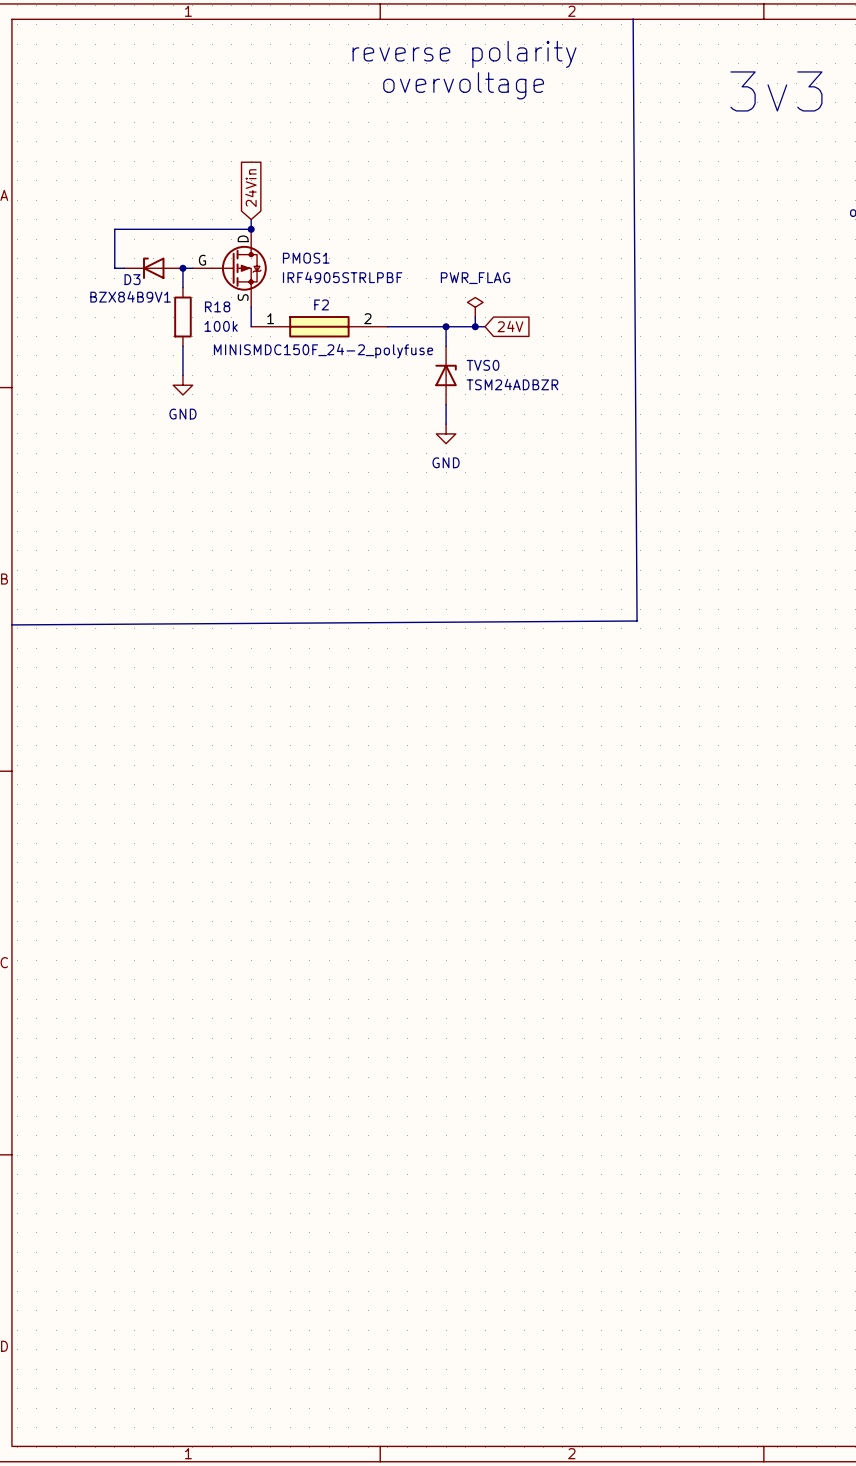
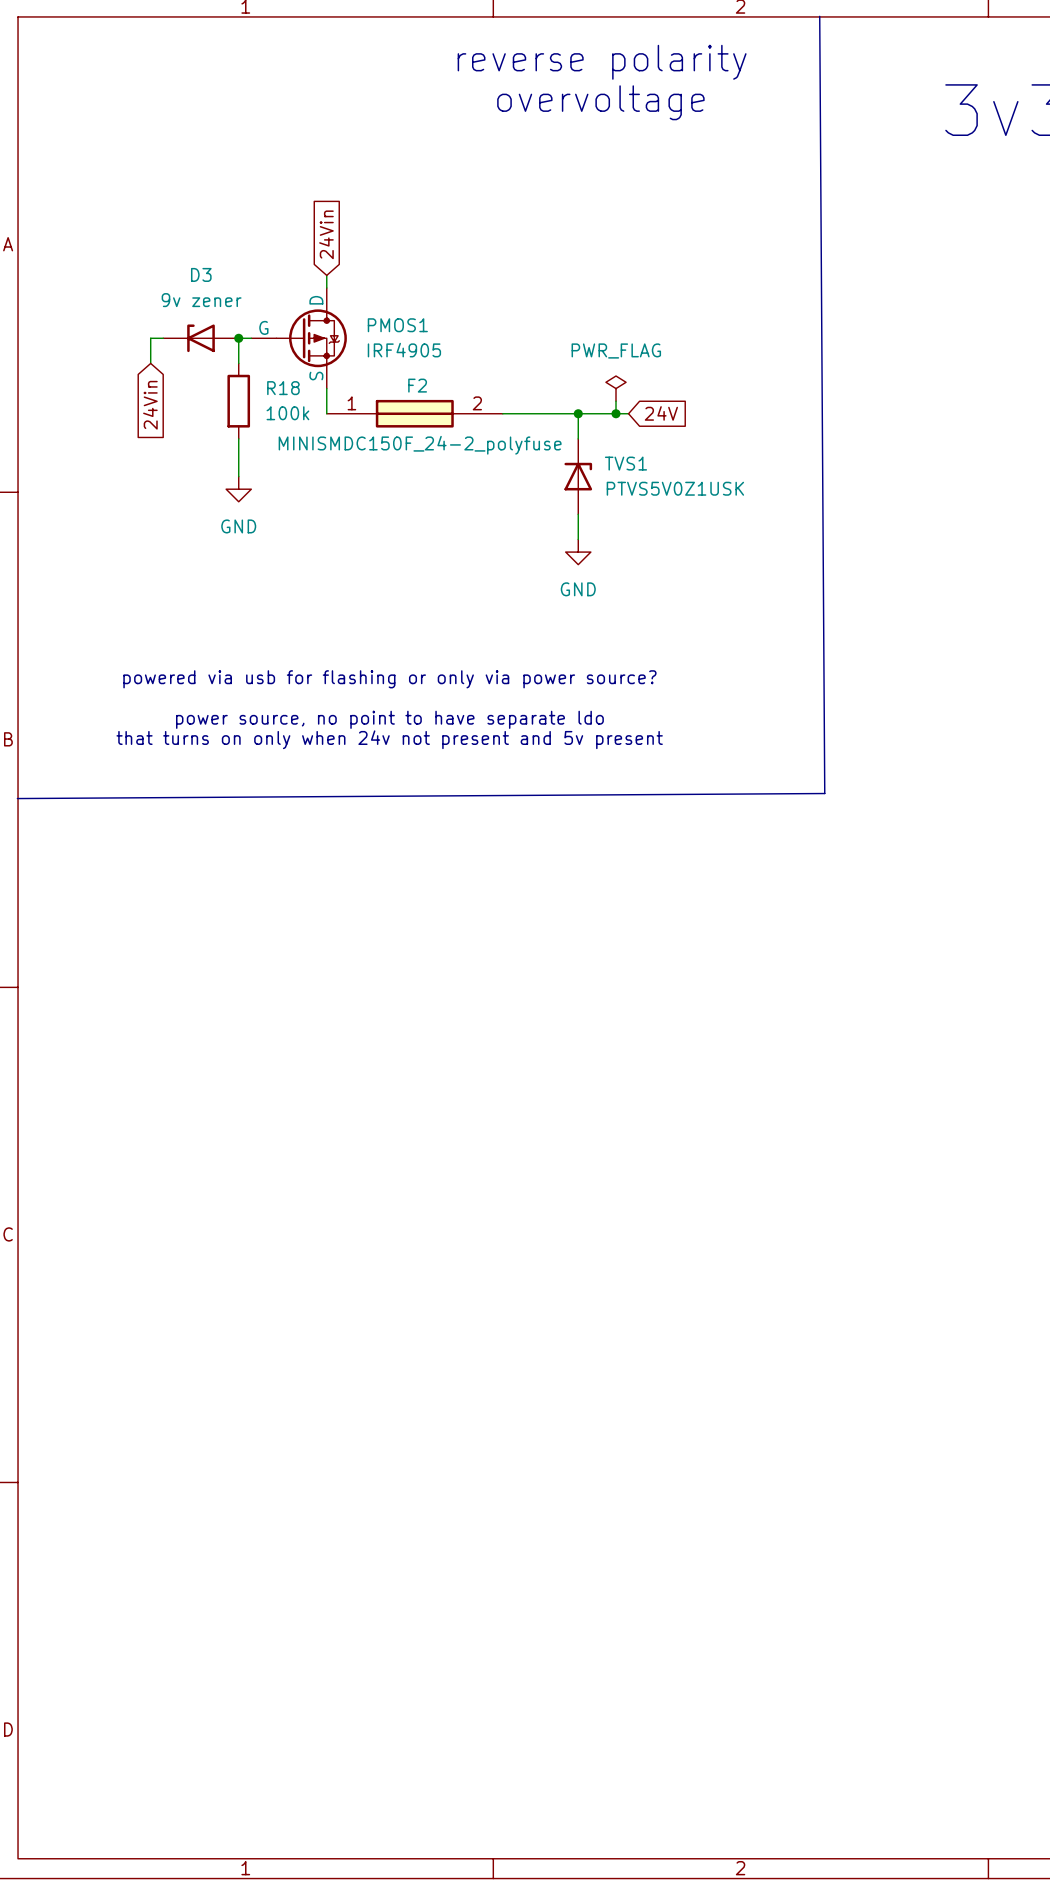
wire: (251, 229) (114, 229) (114, 268) -> (150, 363) (150, 338)
junction: (251, 229) -> none
PMOS1 value: IRF4905STRLPBF (342, 277) -> IRF4905 (404, 350)
D3 name position: D3 (132, 279) -> D3 (201, 274)
D3 value: BZX84B9V1 (130, 296) -> 9v zener (201, 300)
global label: none -> 24Vin (150, 405)
TVS0 name: TVS0 (483, 365) -> TVS1 (625, 463)
TVS0 value: TSM24ADBZR (512, 384) -> PTVS5V0Z1USK (675, 488)
text: none -> powered via usb for flashing or only via power source? (389, 679)
text: none -> power source, no point to have separate ldo (389, 719)
text: none -> that turns on only when 24v not present and 5v present (389, 739)

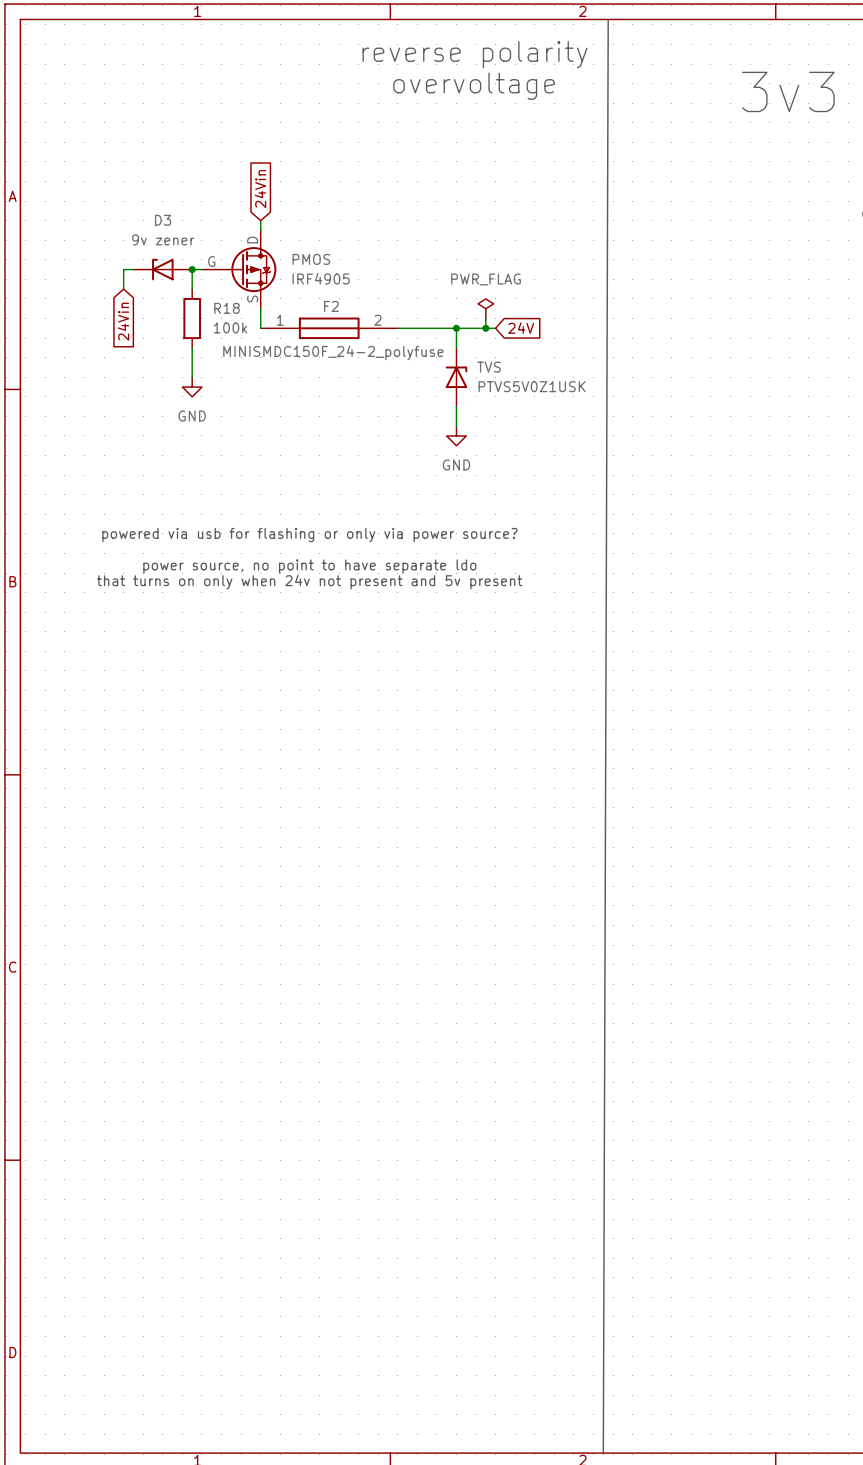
line: (819, 16) (824, 793) (17, 798) -> none
line: none -> (608, 19) (603, 1454)
PMOS1 name: PMOS1 (397, 325) -> PMOS (311, 259)
TVS1 name: TVS1 (625, 463) -> TVS (488, 367)

